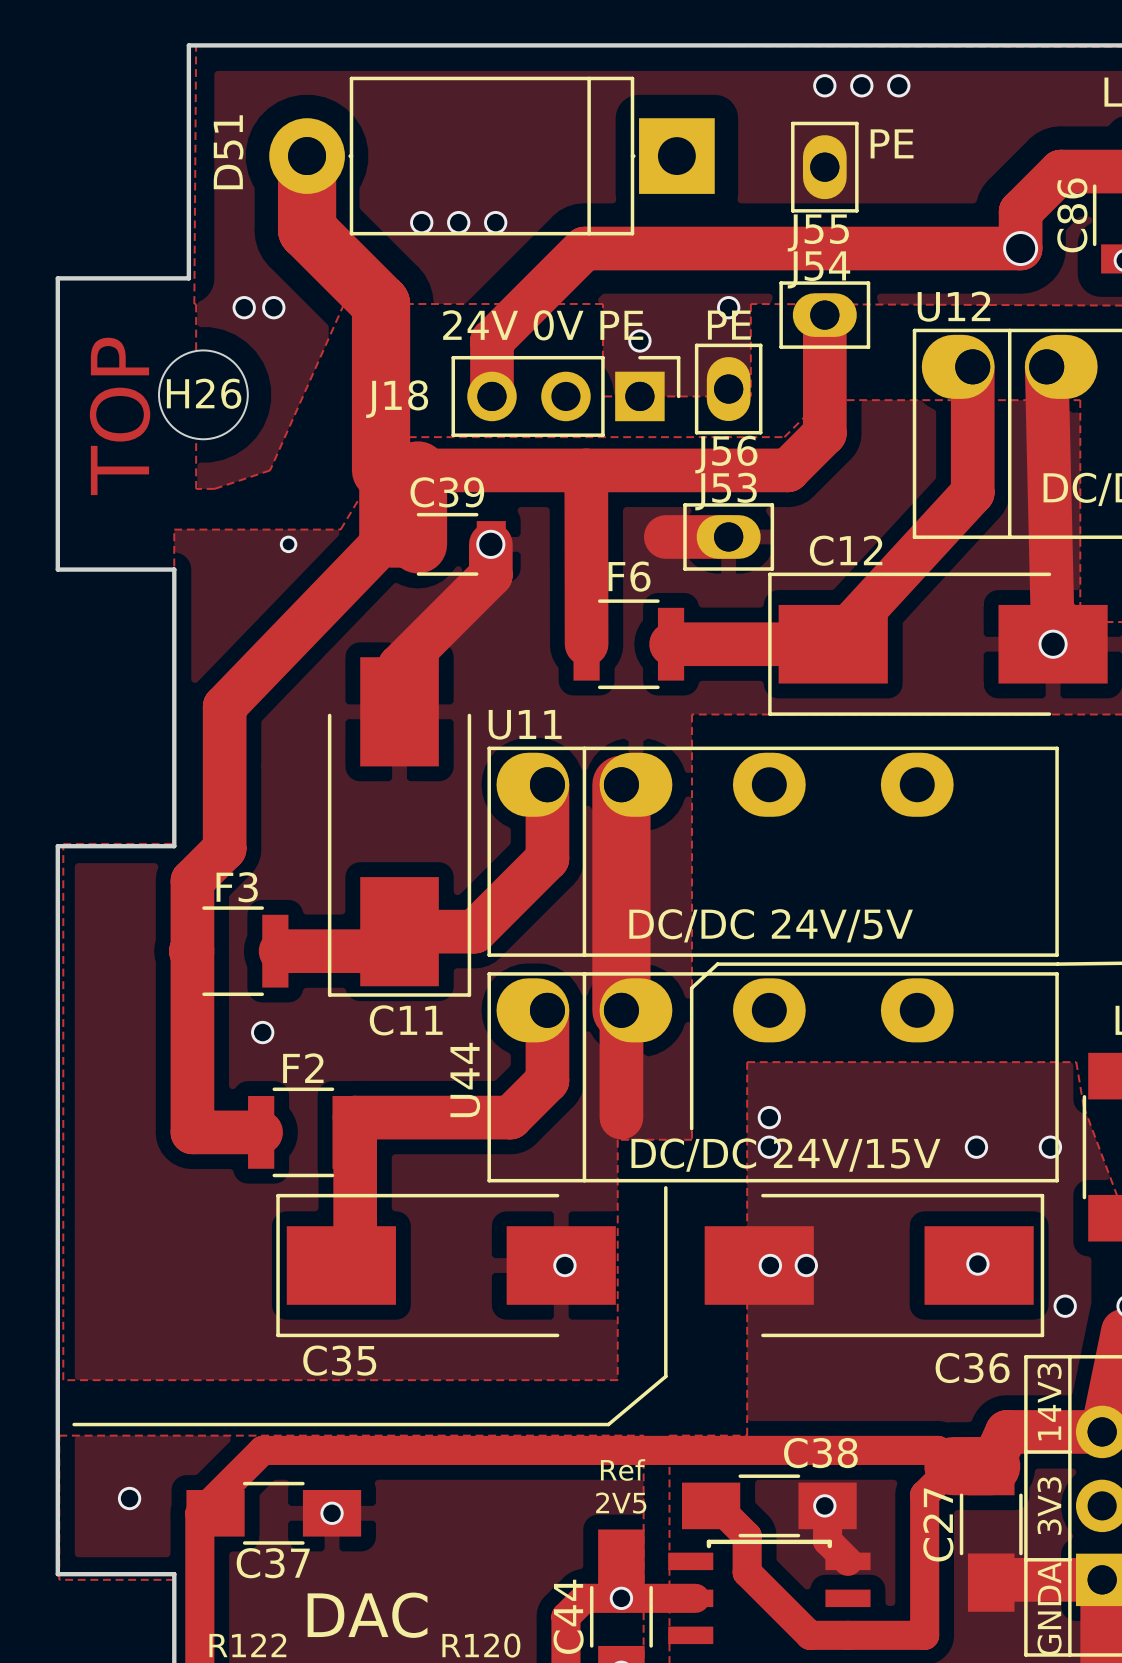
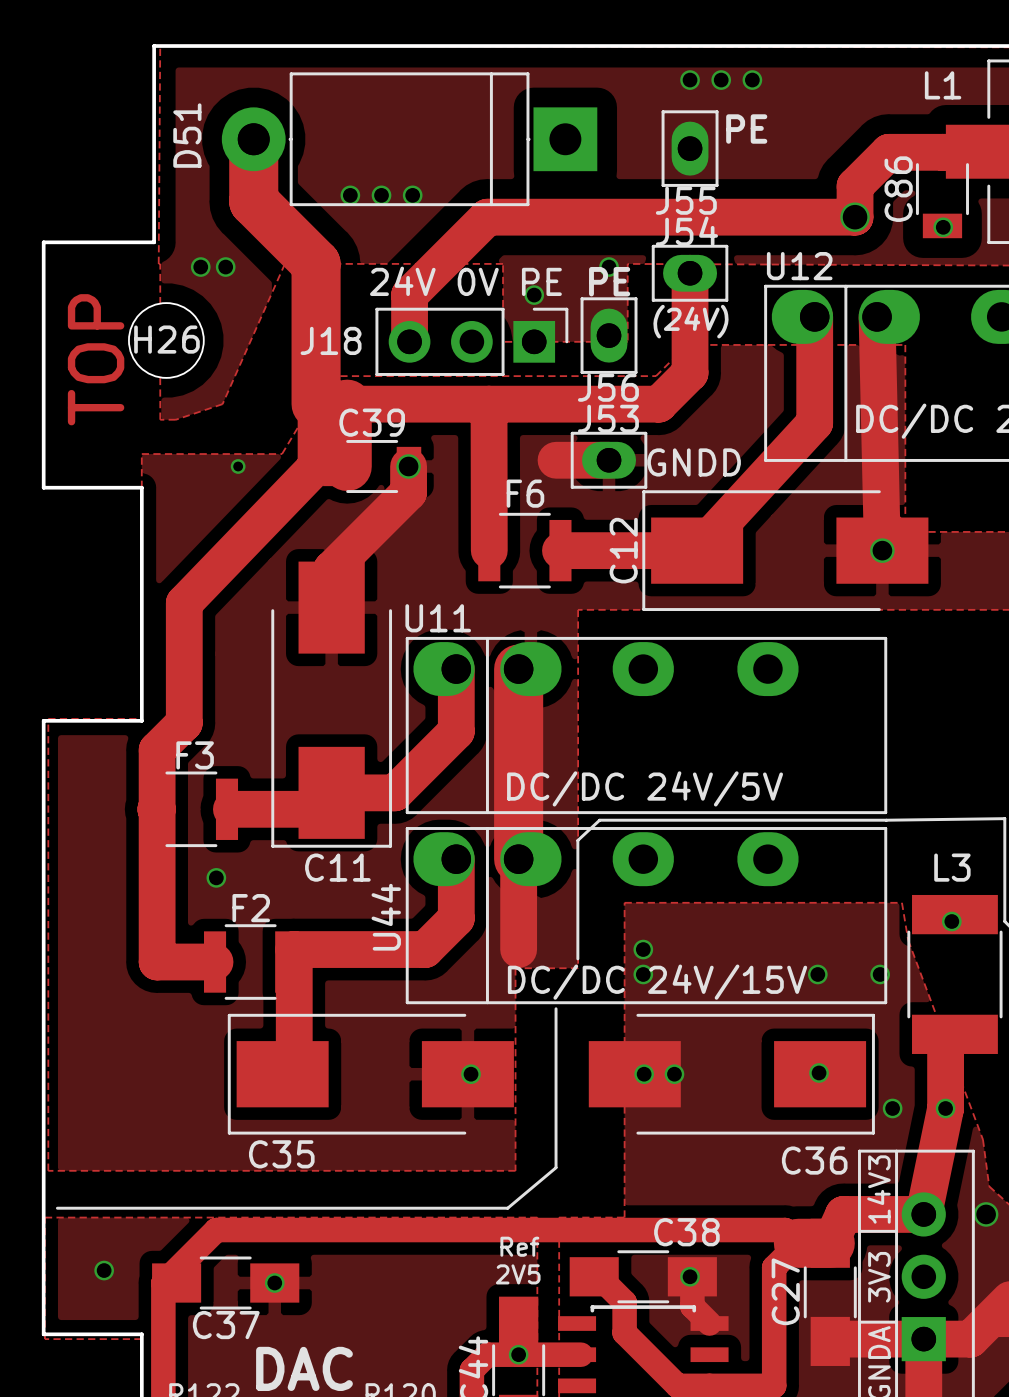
text: none -> (24V) (690, 321)
text: none -> GNDD (694, 462)
C12 name rotation: 0° (846, 550) -> 90° counterclockwise (623, 550)
C12 name position: C12 (846, 550) -> C12 (623, 550)

